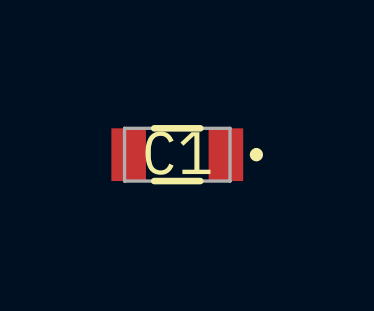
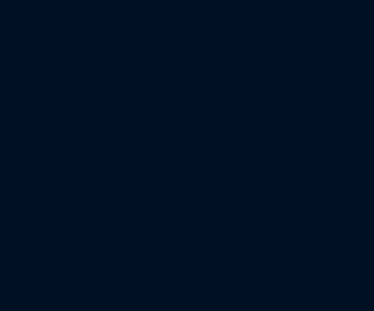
C1: (187, 154) -> none

